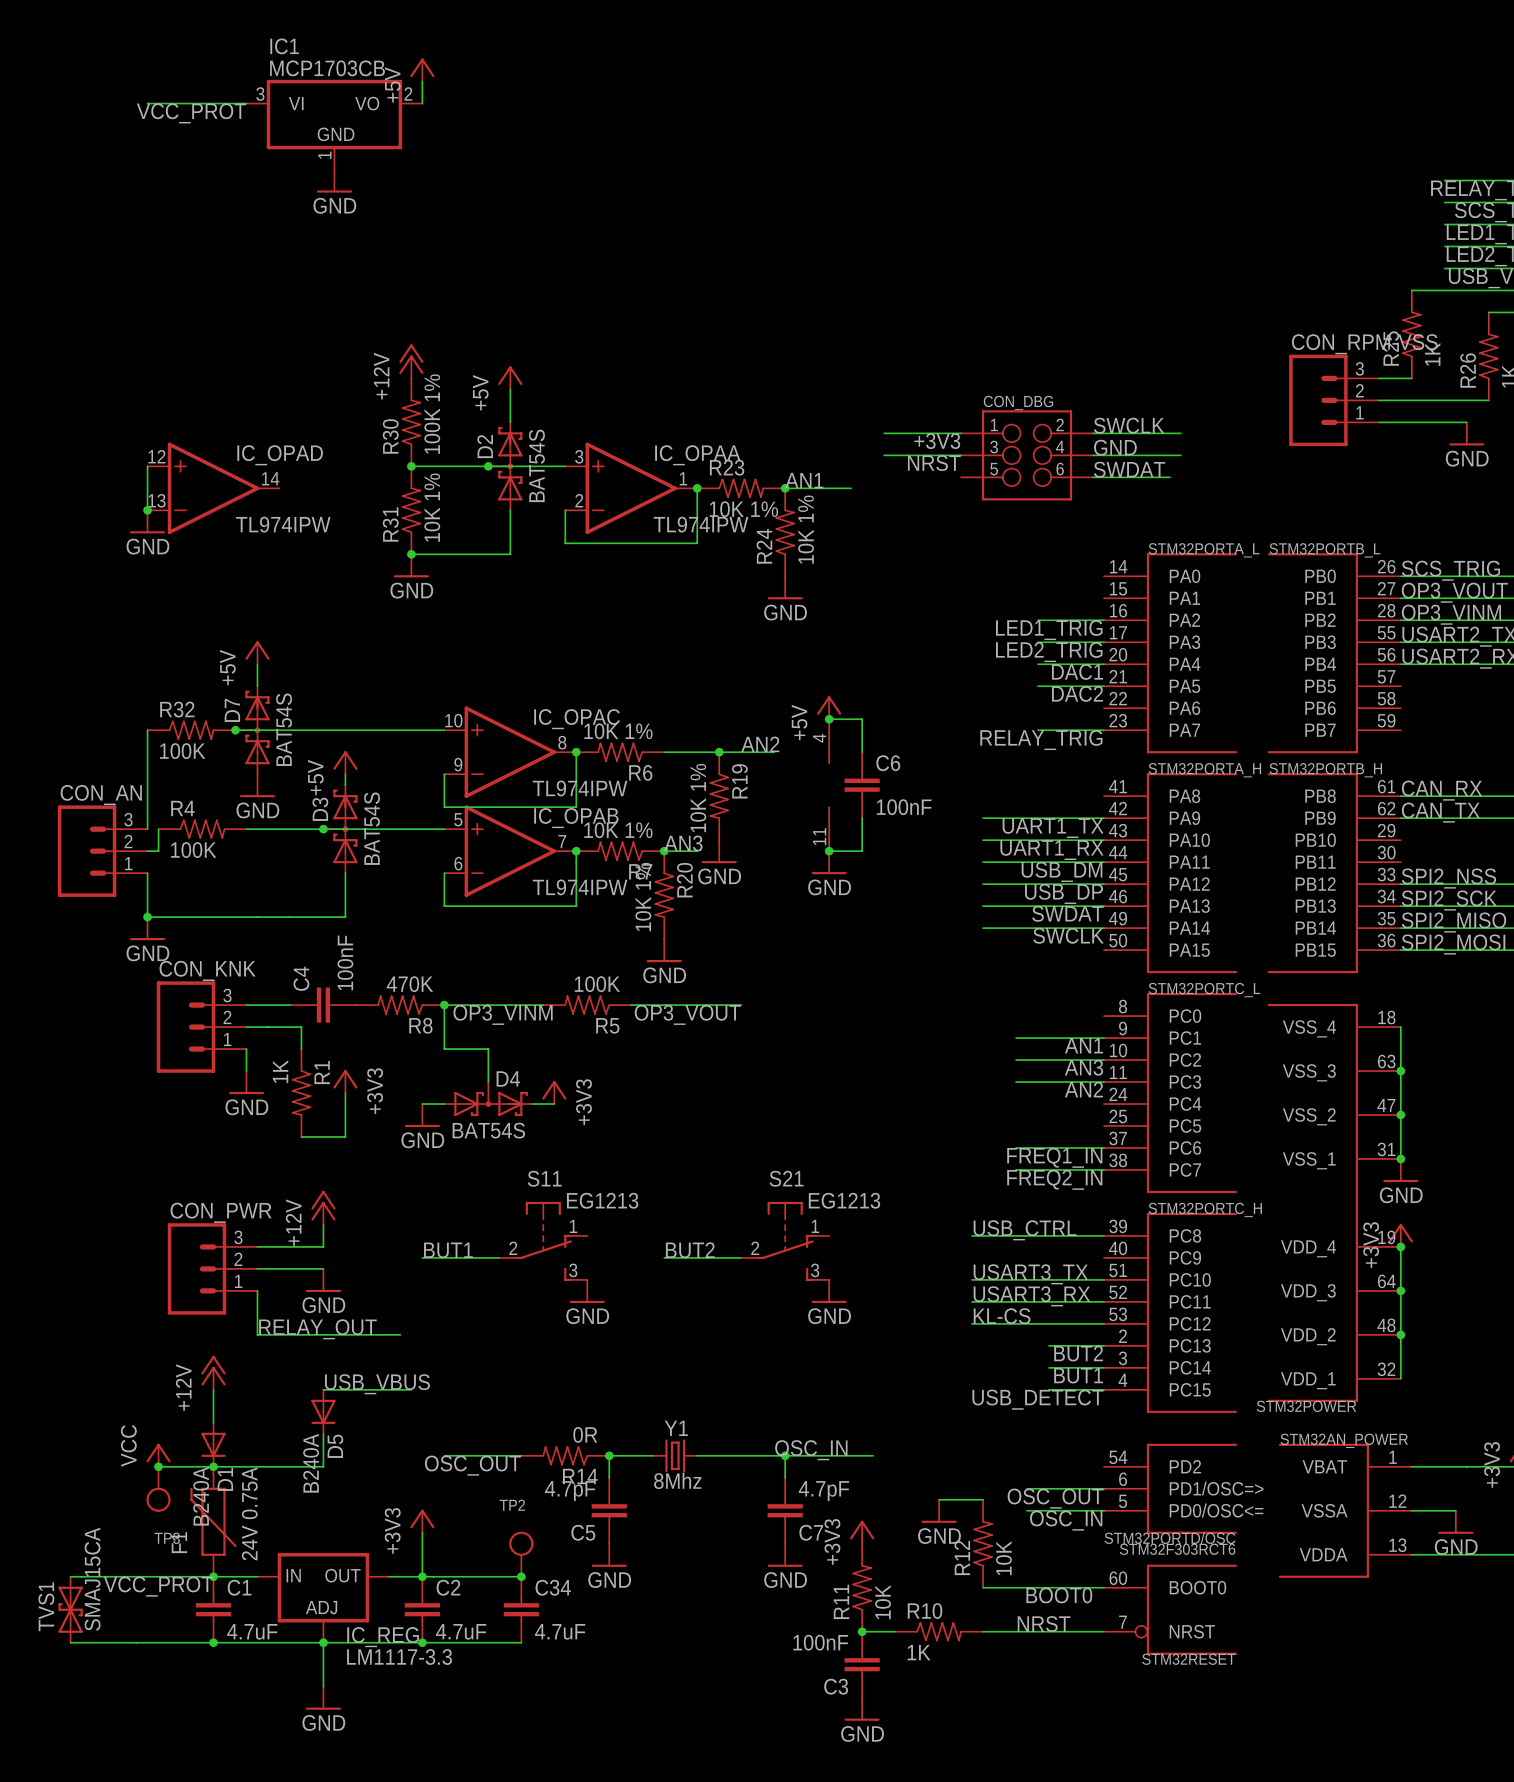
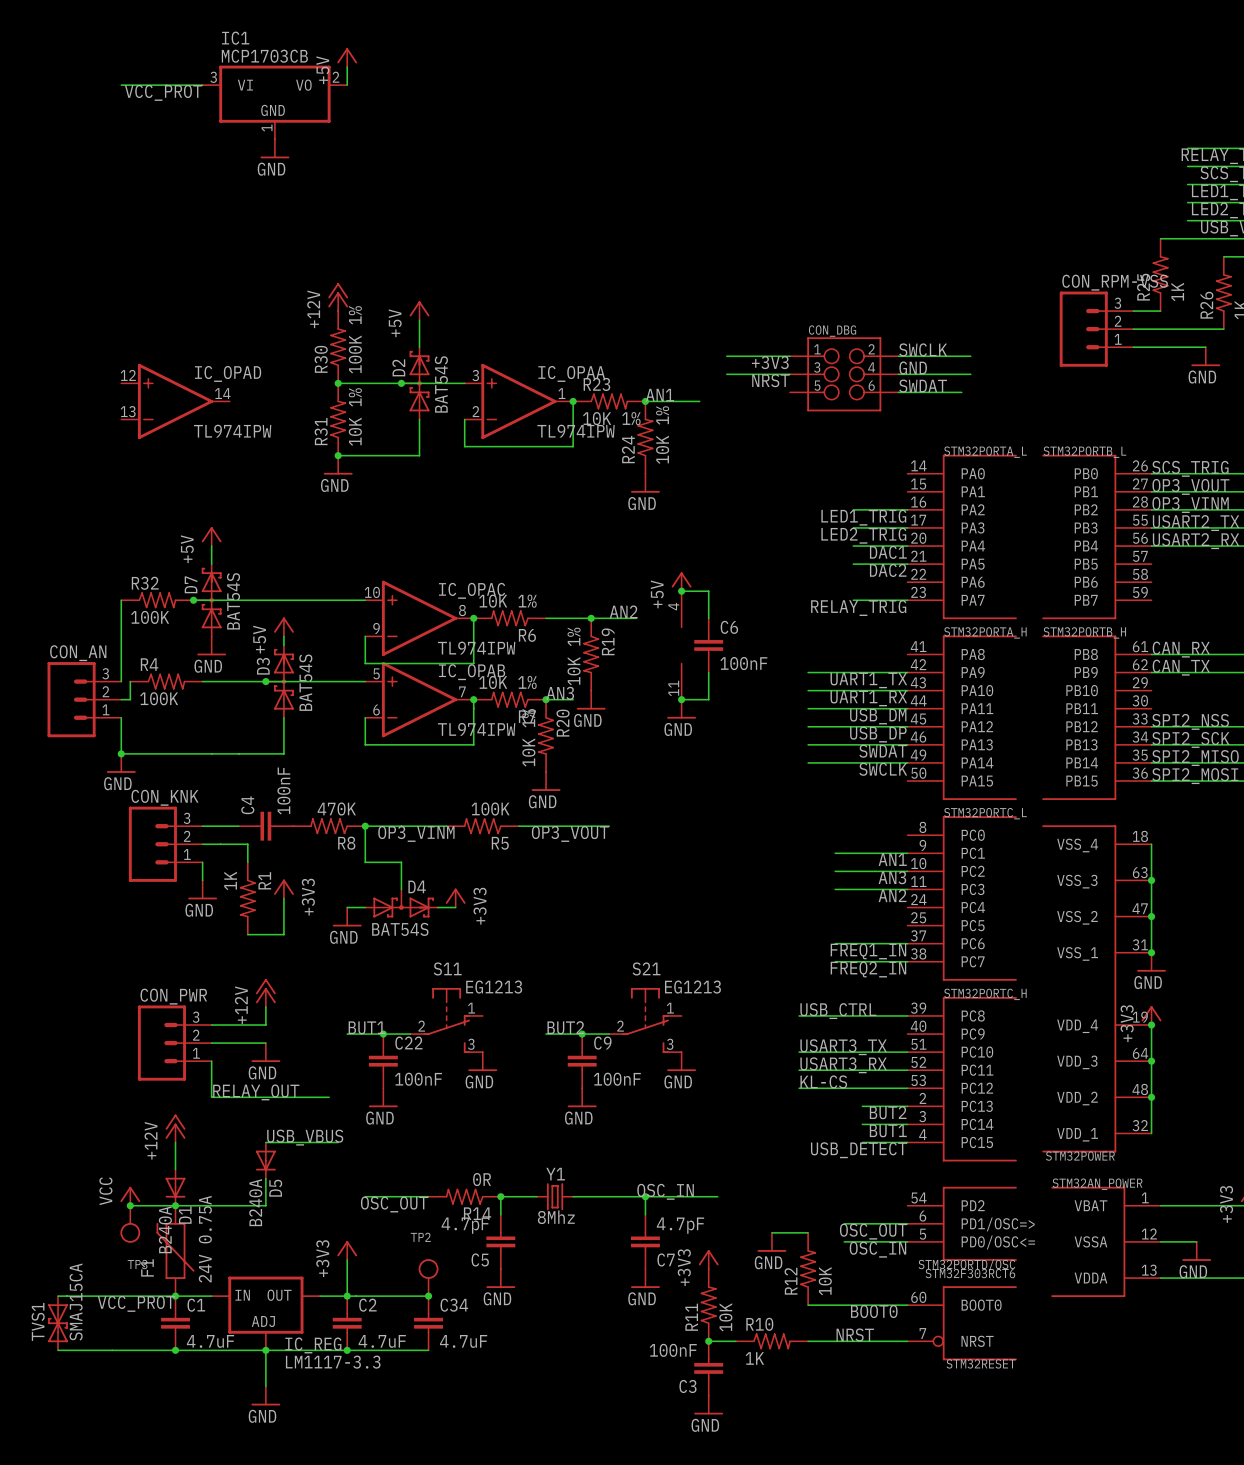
wire: (147, 466) (147, 510) -> none
junction: (147, 510) -> none
power symbol: GND (147, 521) -> none
junction: none -> (383, 1034)
junction: none -> (582, 1034)
C22: none -> 100nF (383, 1061)
C9: none -> 100nF (582, 1061)
power symbol: none -> GND (383, 1097)
power symbol: none -> GND (582, 1097)

